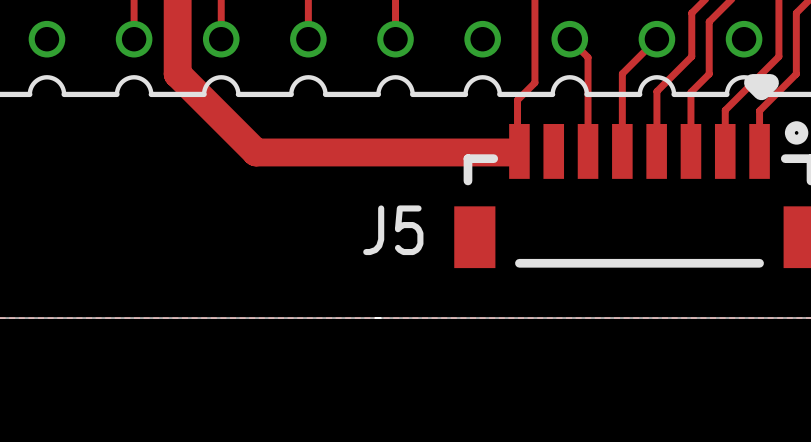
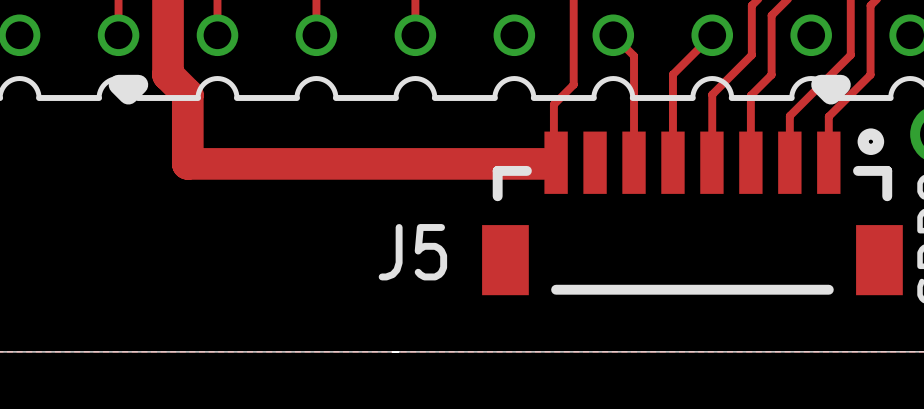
drawing: none -> [108, 74, 149, 105]
track: (195, 91) (256, 152) -> (187, 94) (187, 163) (257, 163)

